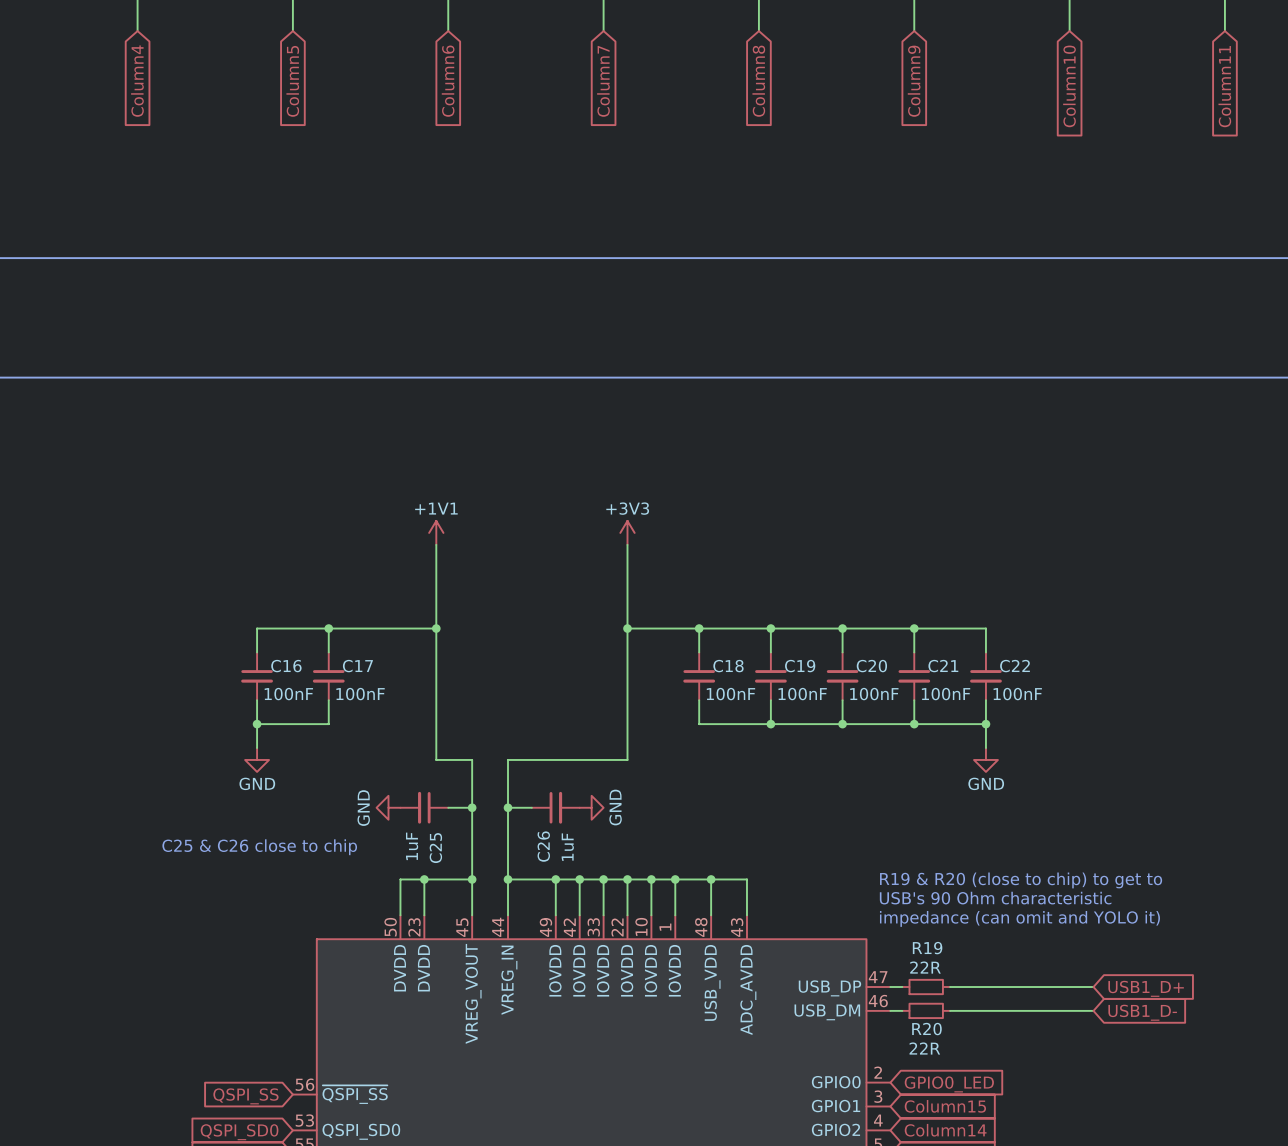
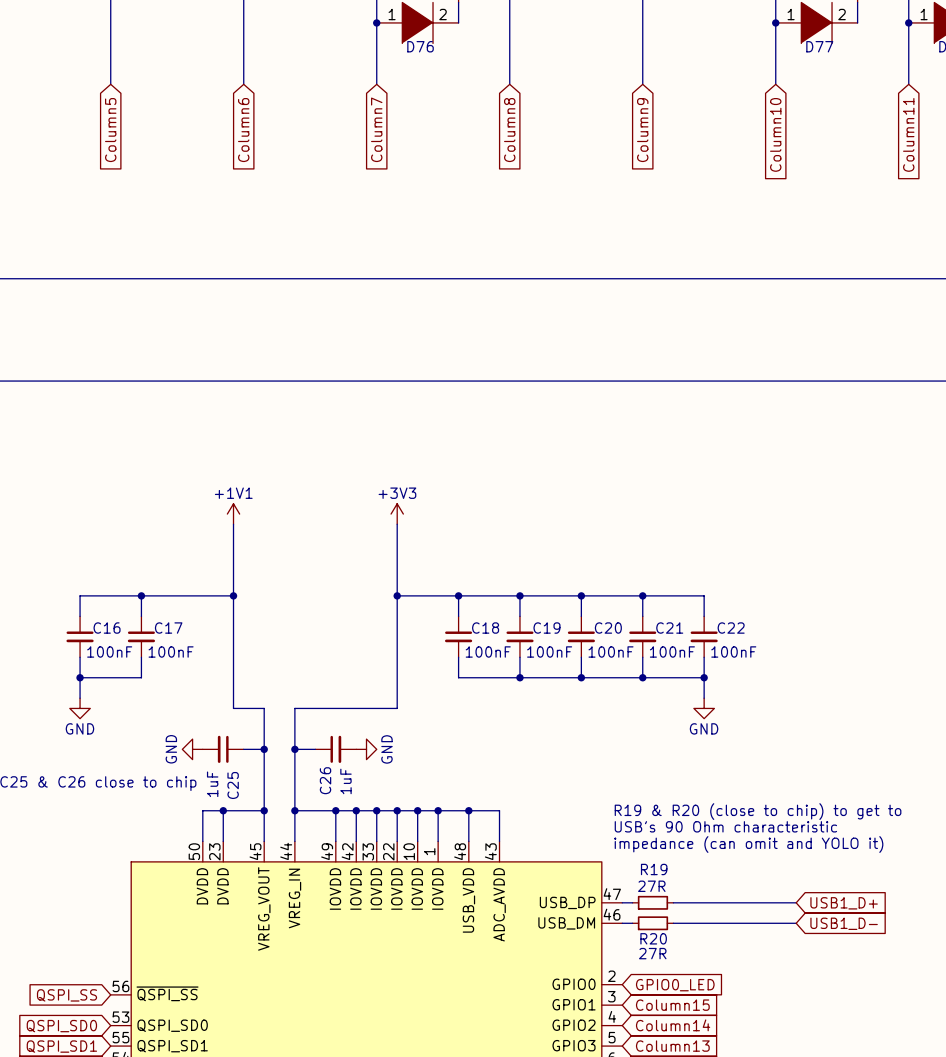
R19 value: 22R (925, 967) -> 27R (651, 886)
R20 value: 22R (924, 1048) -> 27R (652, 953)

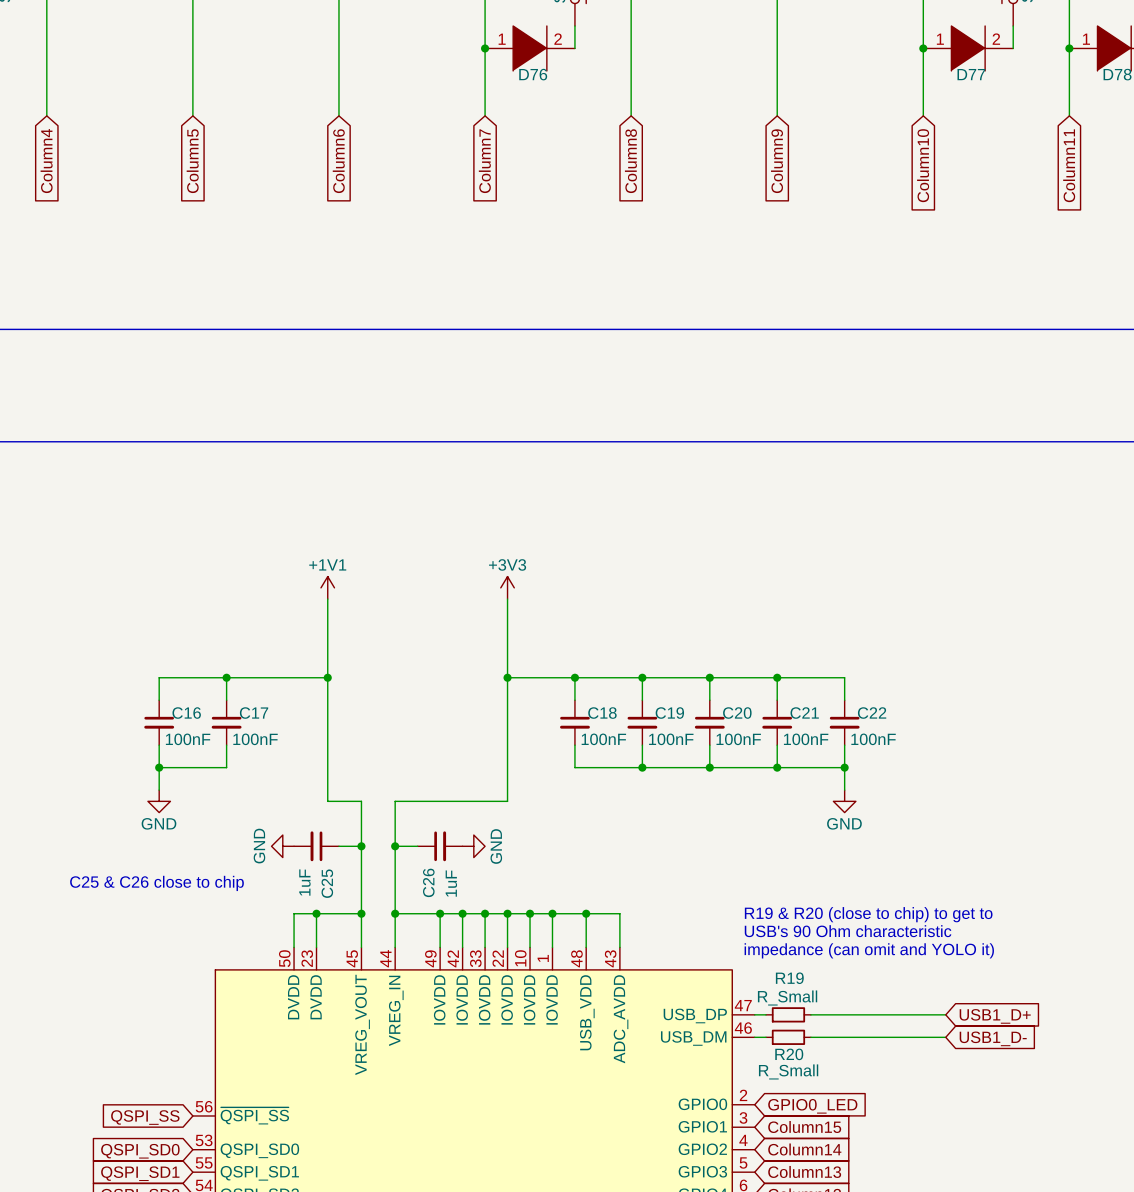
R19 value: 27R (651, 886) -> R_Small (787, 997)
R20 value: 27R (652, 953) -> R_Small (788, 1071)

